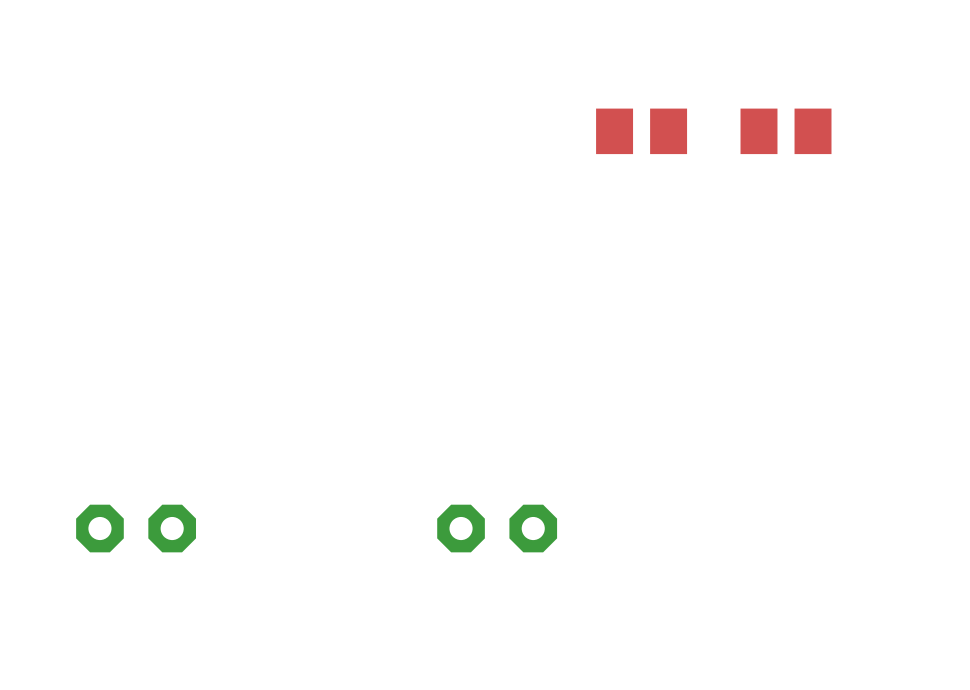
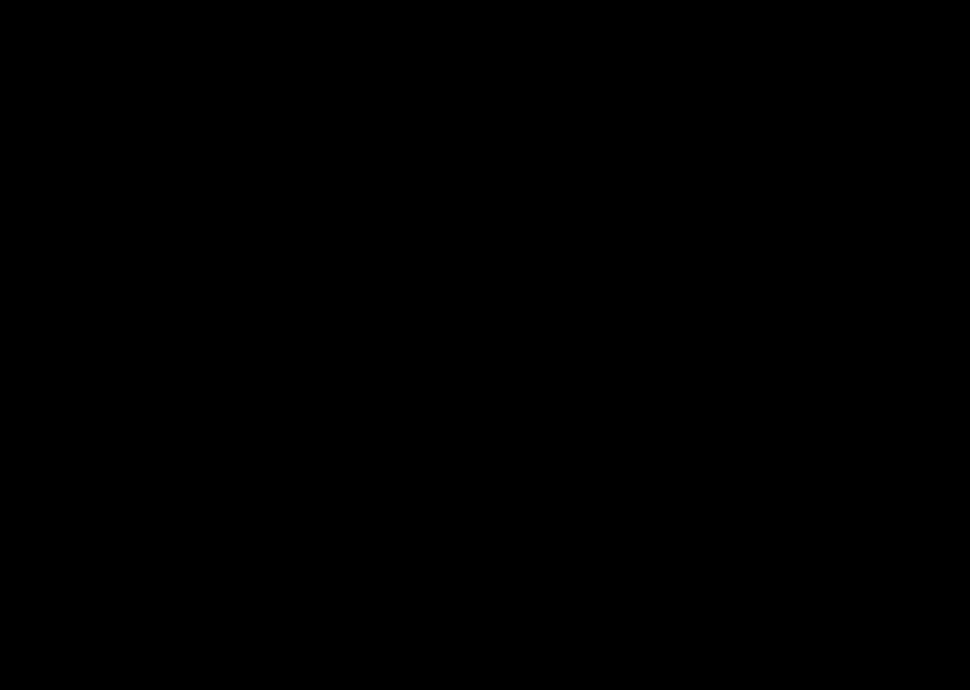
part: (641, 131) -> none
part: (786, 131) -> none
part: (136, 528) -> none
part: (497, 528) -> none

